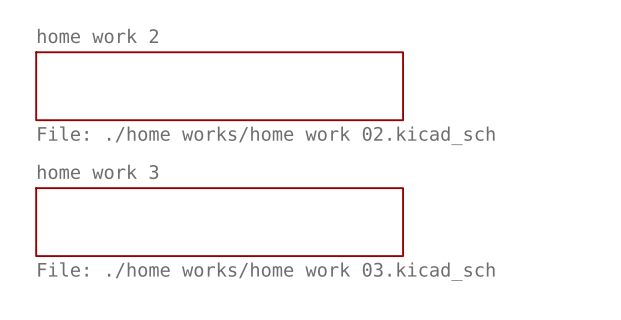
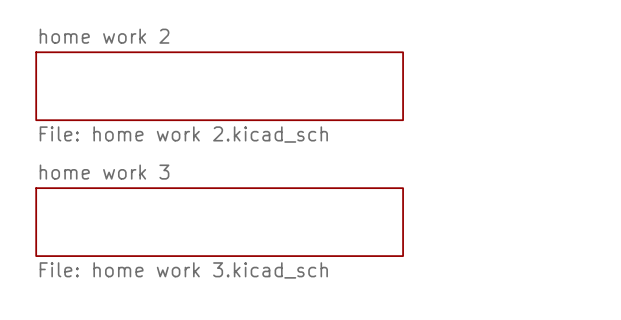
sheet home work 2 value: File: ./home works/home work 02.kicad_sch (266, 135) -> File: home work 2.kicad_sch (183, 134)
sheet home work 3 value: File: ./home works/home work 03.kicad_sch (266, 271) -> File: home work 3.kicad_sch (183, 270)

